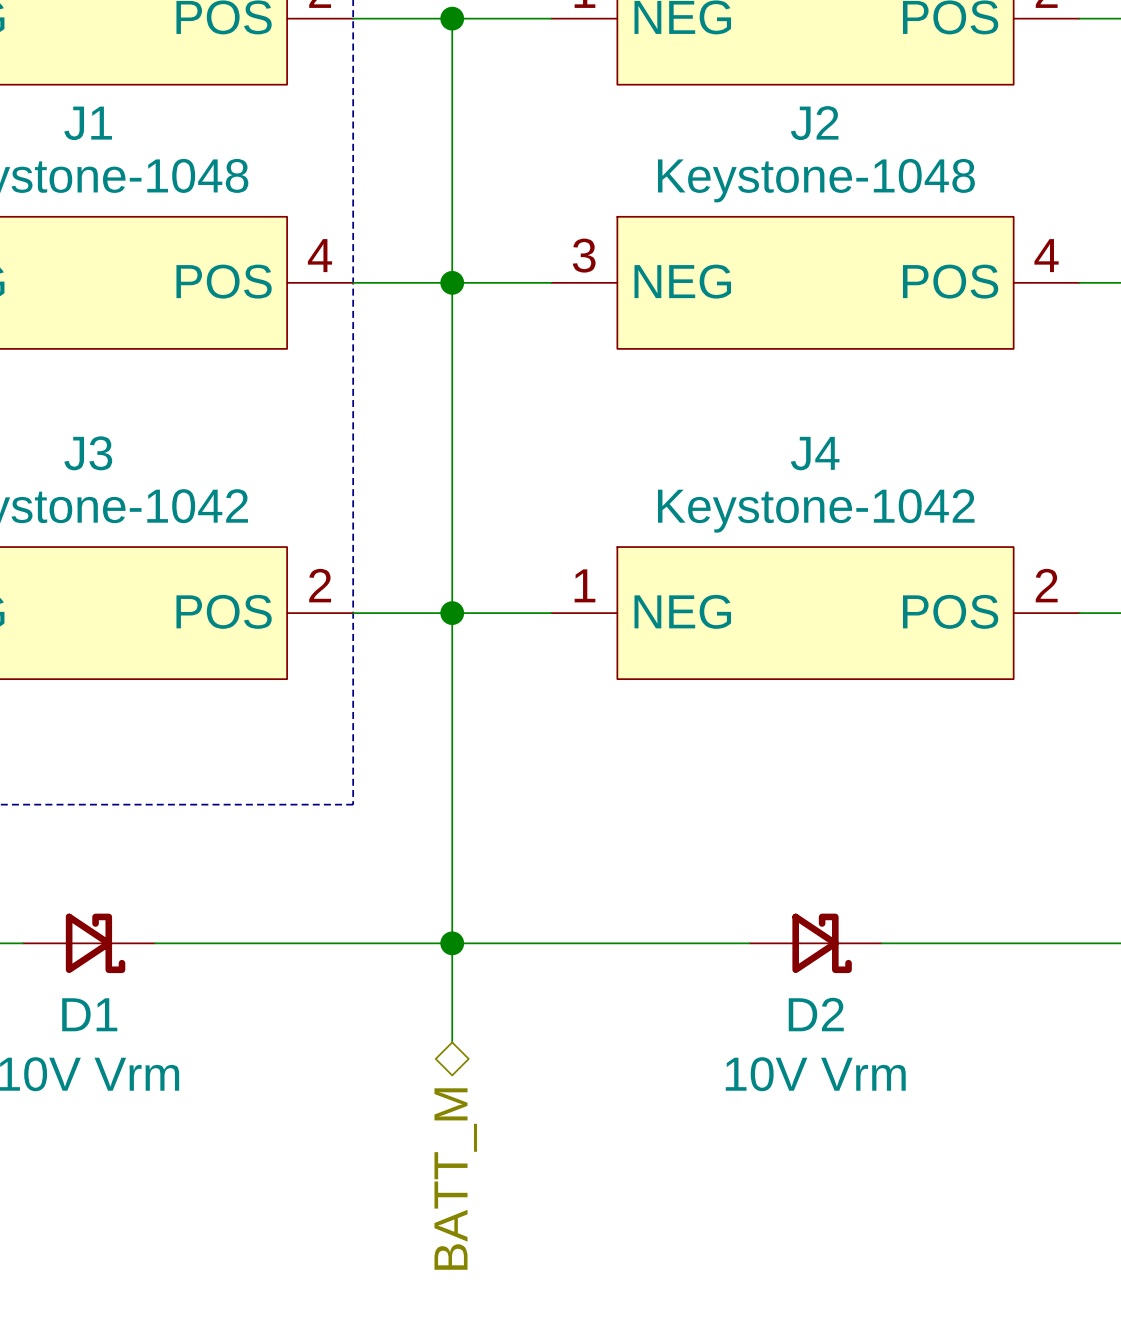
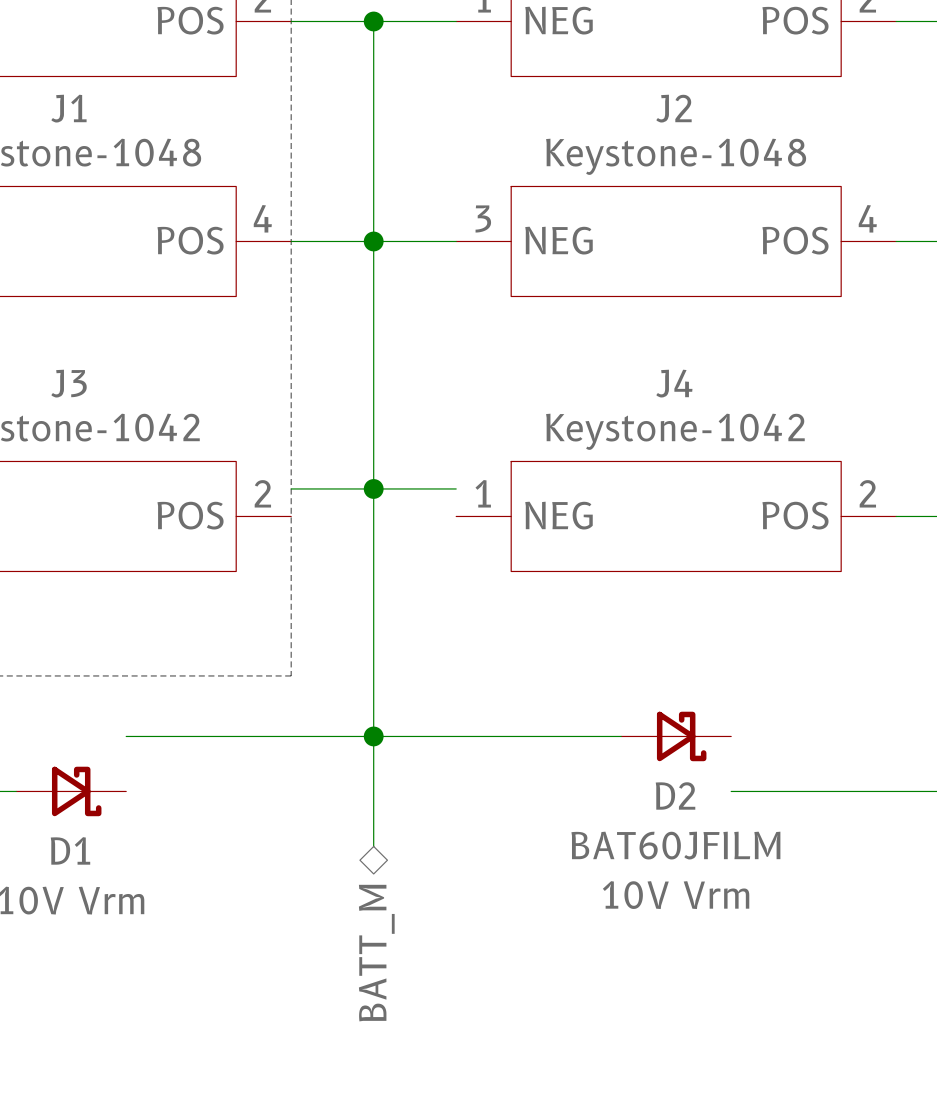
wire: (353, 613) (551, 613) -> (291, 488) (456, 488)
junction position: (452, 613) -> (373, 488)
wire: (155, 943) (749, 943) -> (126, 736) (621, 736)
junction position: (452, 943) -> (373, 736)
D2 position: (815, 943) -> (676, 736)
wire: (452, 1009) (452, 1042) -> none
D2 text: none -> 10V Vrm (676, 895)
D2 value: 10V Vrm (815, 1074) -> BAT60JFILM (675, 845)
hierarchical label position: BATT_M (455, 1179) -> BATT_M (376, 953)

